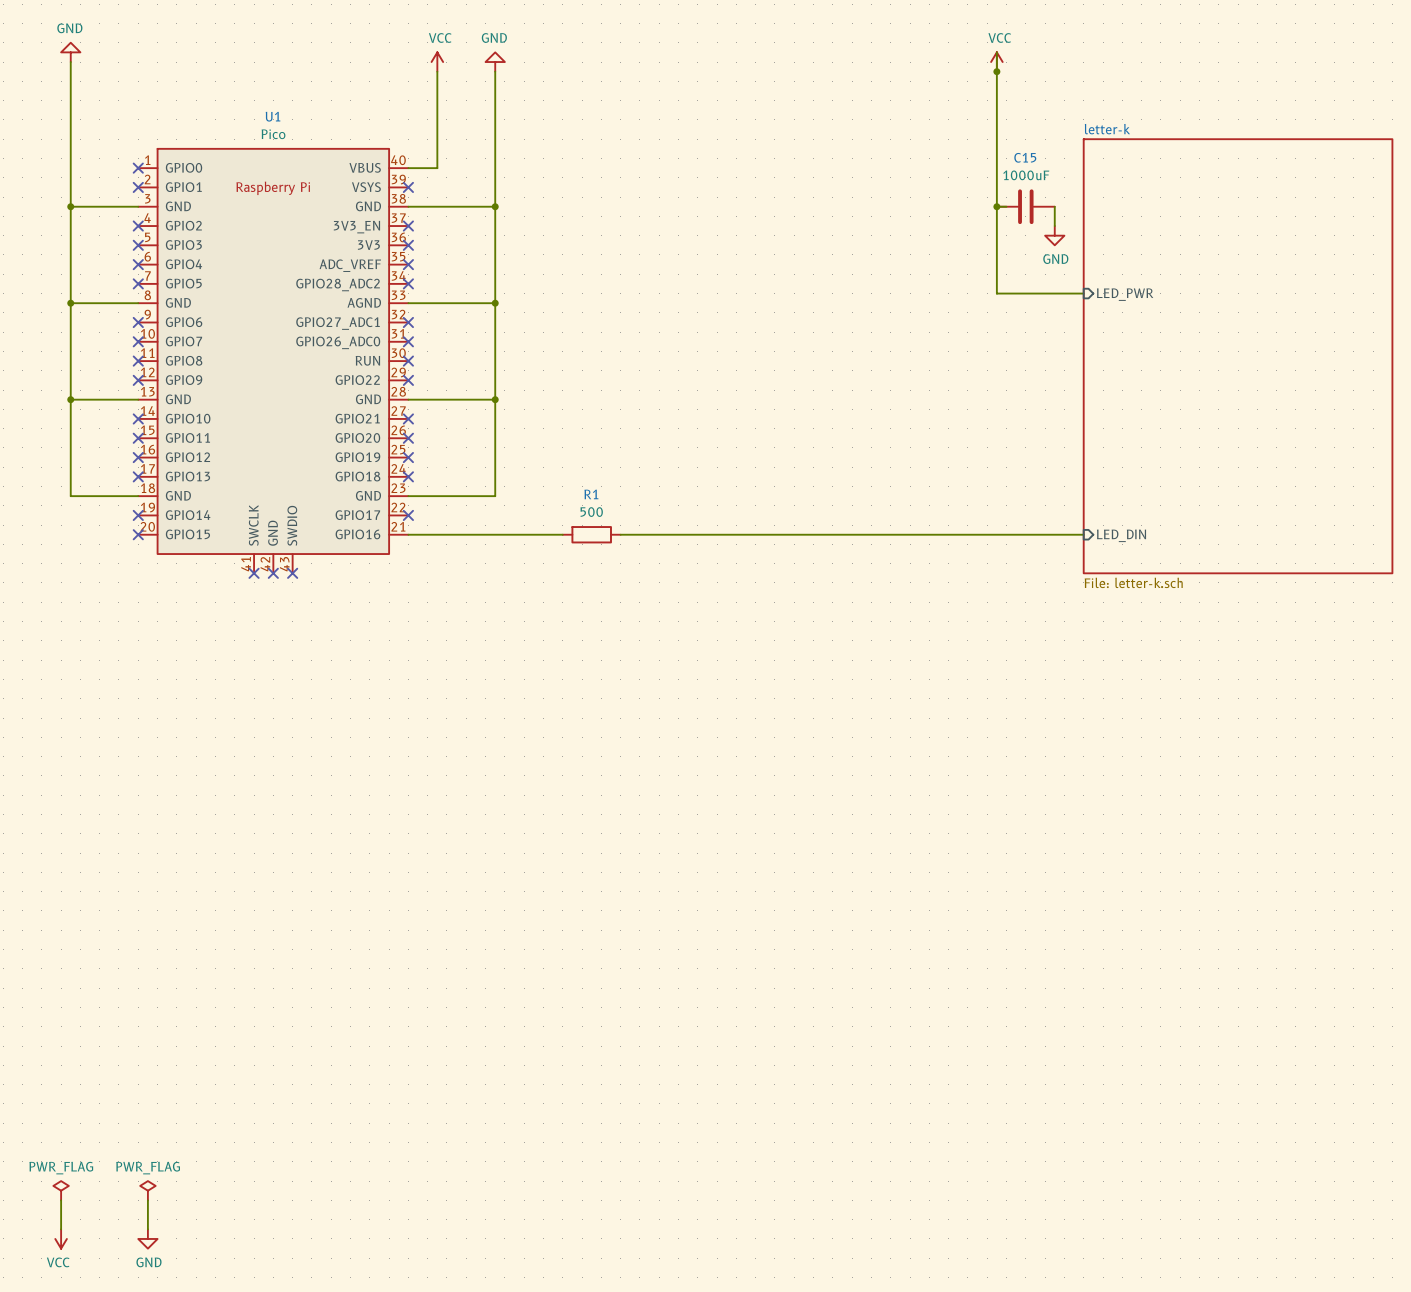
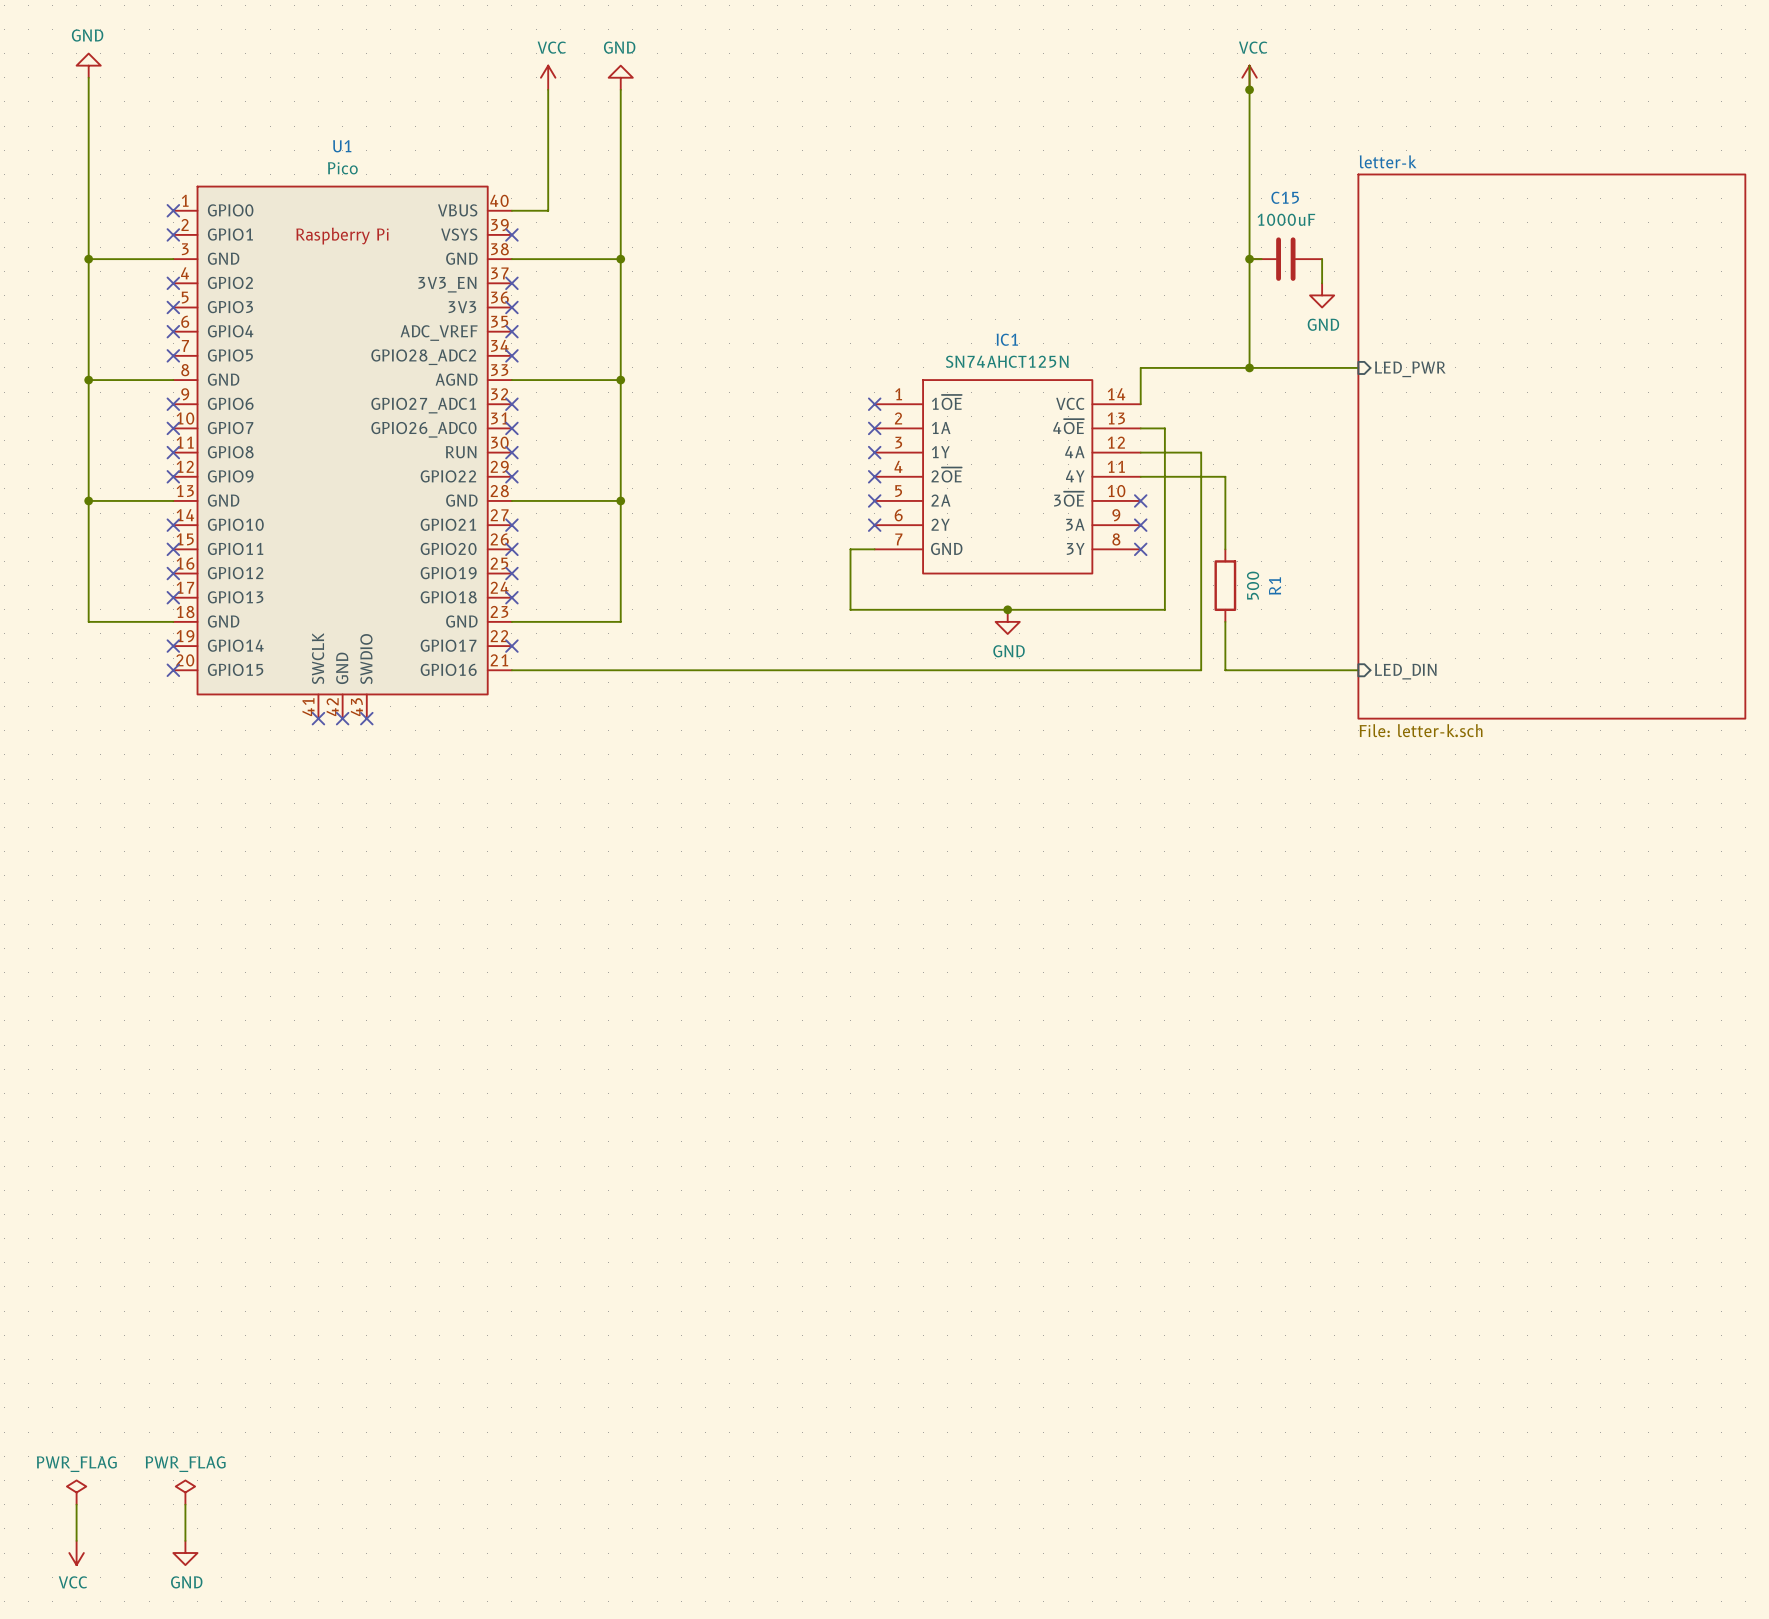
wire: none -> (1249, 367) (1140, 367) (1140, 404)
junction: none -> (1249, 367)
no-connect mark: none -> (874, 404)
no-connect mark: none -> (874, 428)
wire: none -> (1140, 428) (1164, 428) (1164, 609) (850, 609) (850, 549) (874, 549)
no-connect mark: none -> (874, 452)
wire: none -> (1140, 452) (1201, 452) (1201, 670)
no-connect mark: none -> (874, 476)
IC1: none -> SN74AHCT125N (1007, 476)
wire: none -> (1140, 476) (1225, 476) (1225, 549)
no-connect mark: none -> (874, 500)
no-connect mark: none -> (1140, 500)
no-connect mark: none -> (874, 525)
no-connect mark: none -> (1140, 525)
no-connect mark: none -> (1140, 549)
junction: none -> (1007, 609)
power symbol: none -> GND (1007, 621)
wire: none -> (705, 670) (777, 670)
R1 rotation: 0° (591, 534) -> 90° clockwise (1225, 585)
R1 position: (591, 534) -> (1225, 585)
wire: (958, 534) (977, 534) -> (1225, 621) (1225, 670)

